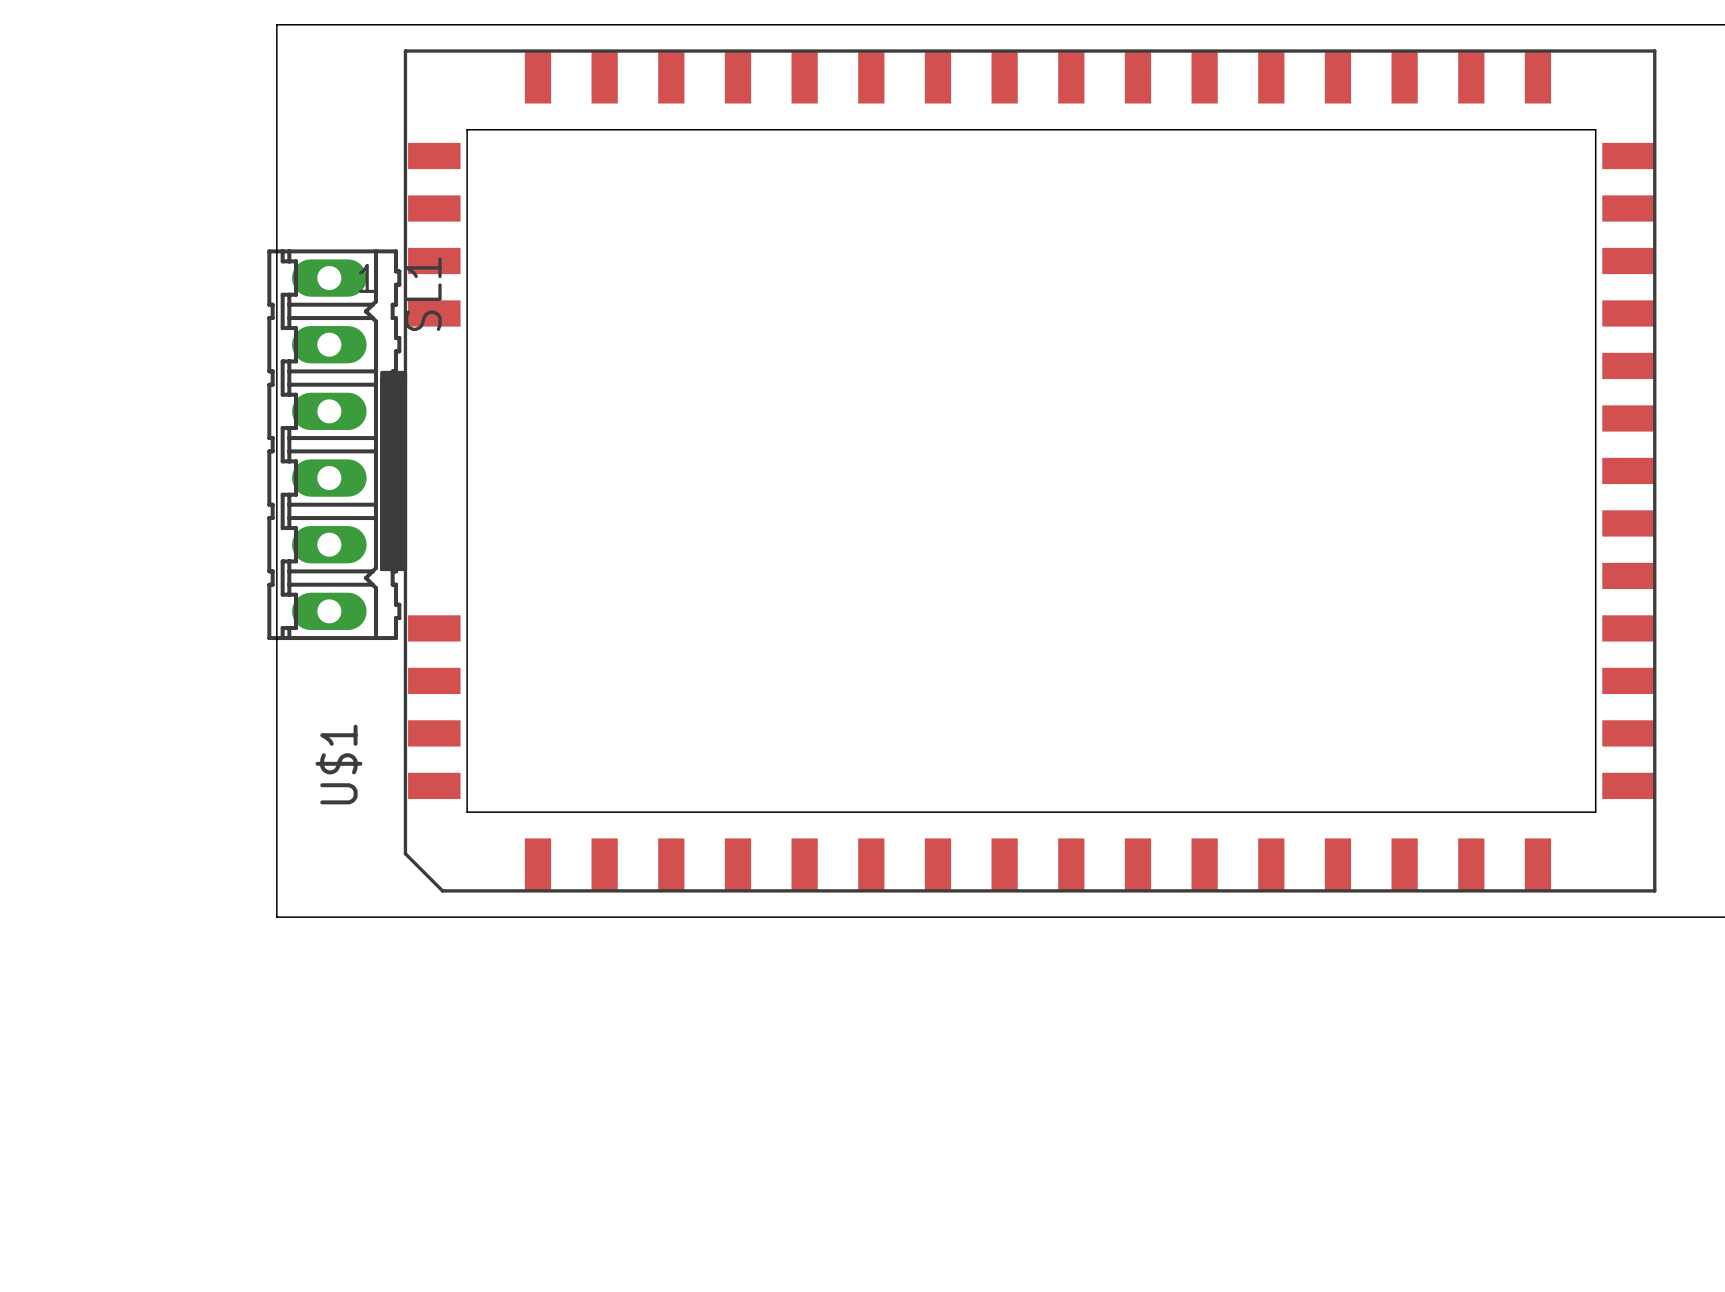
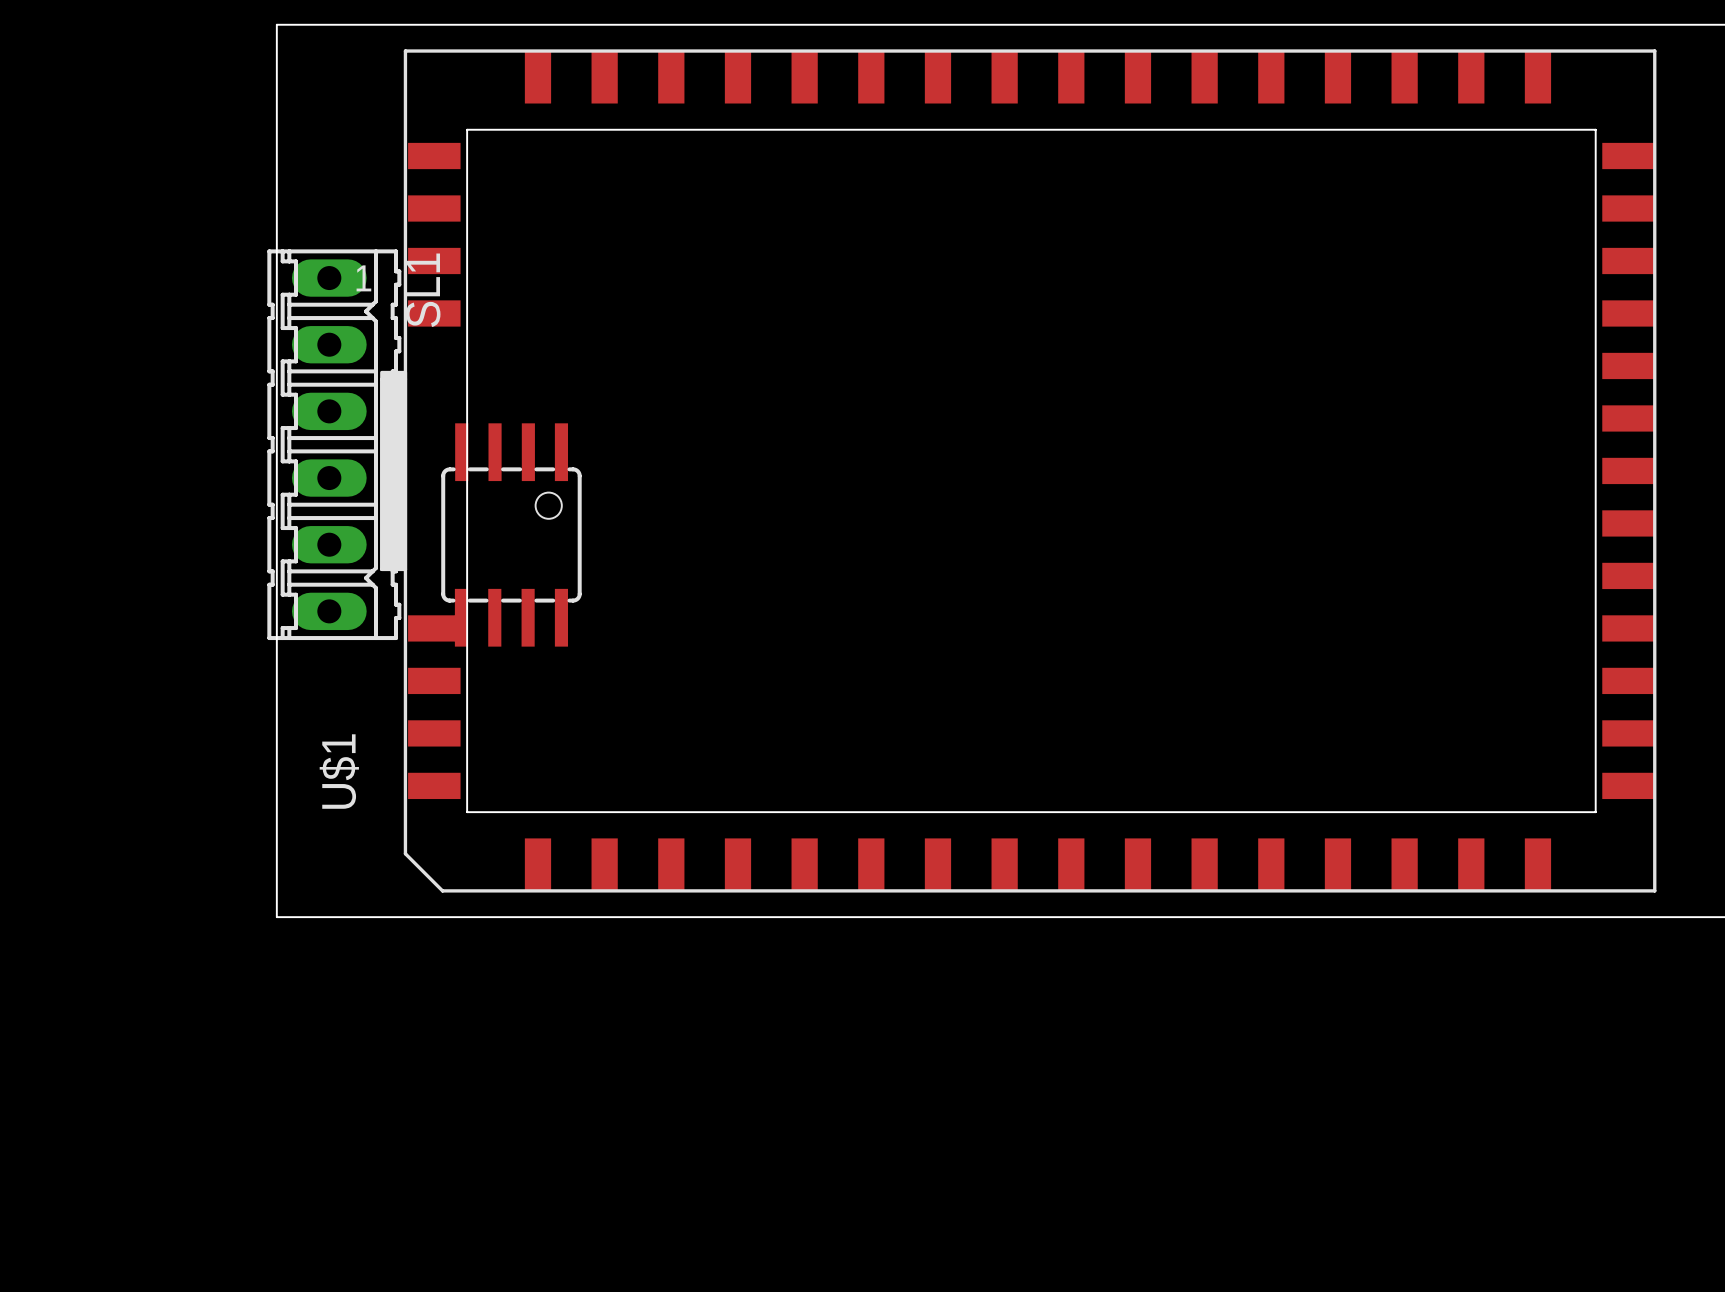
part: none -> (511, 534)

